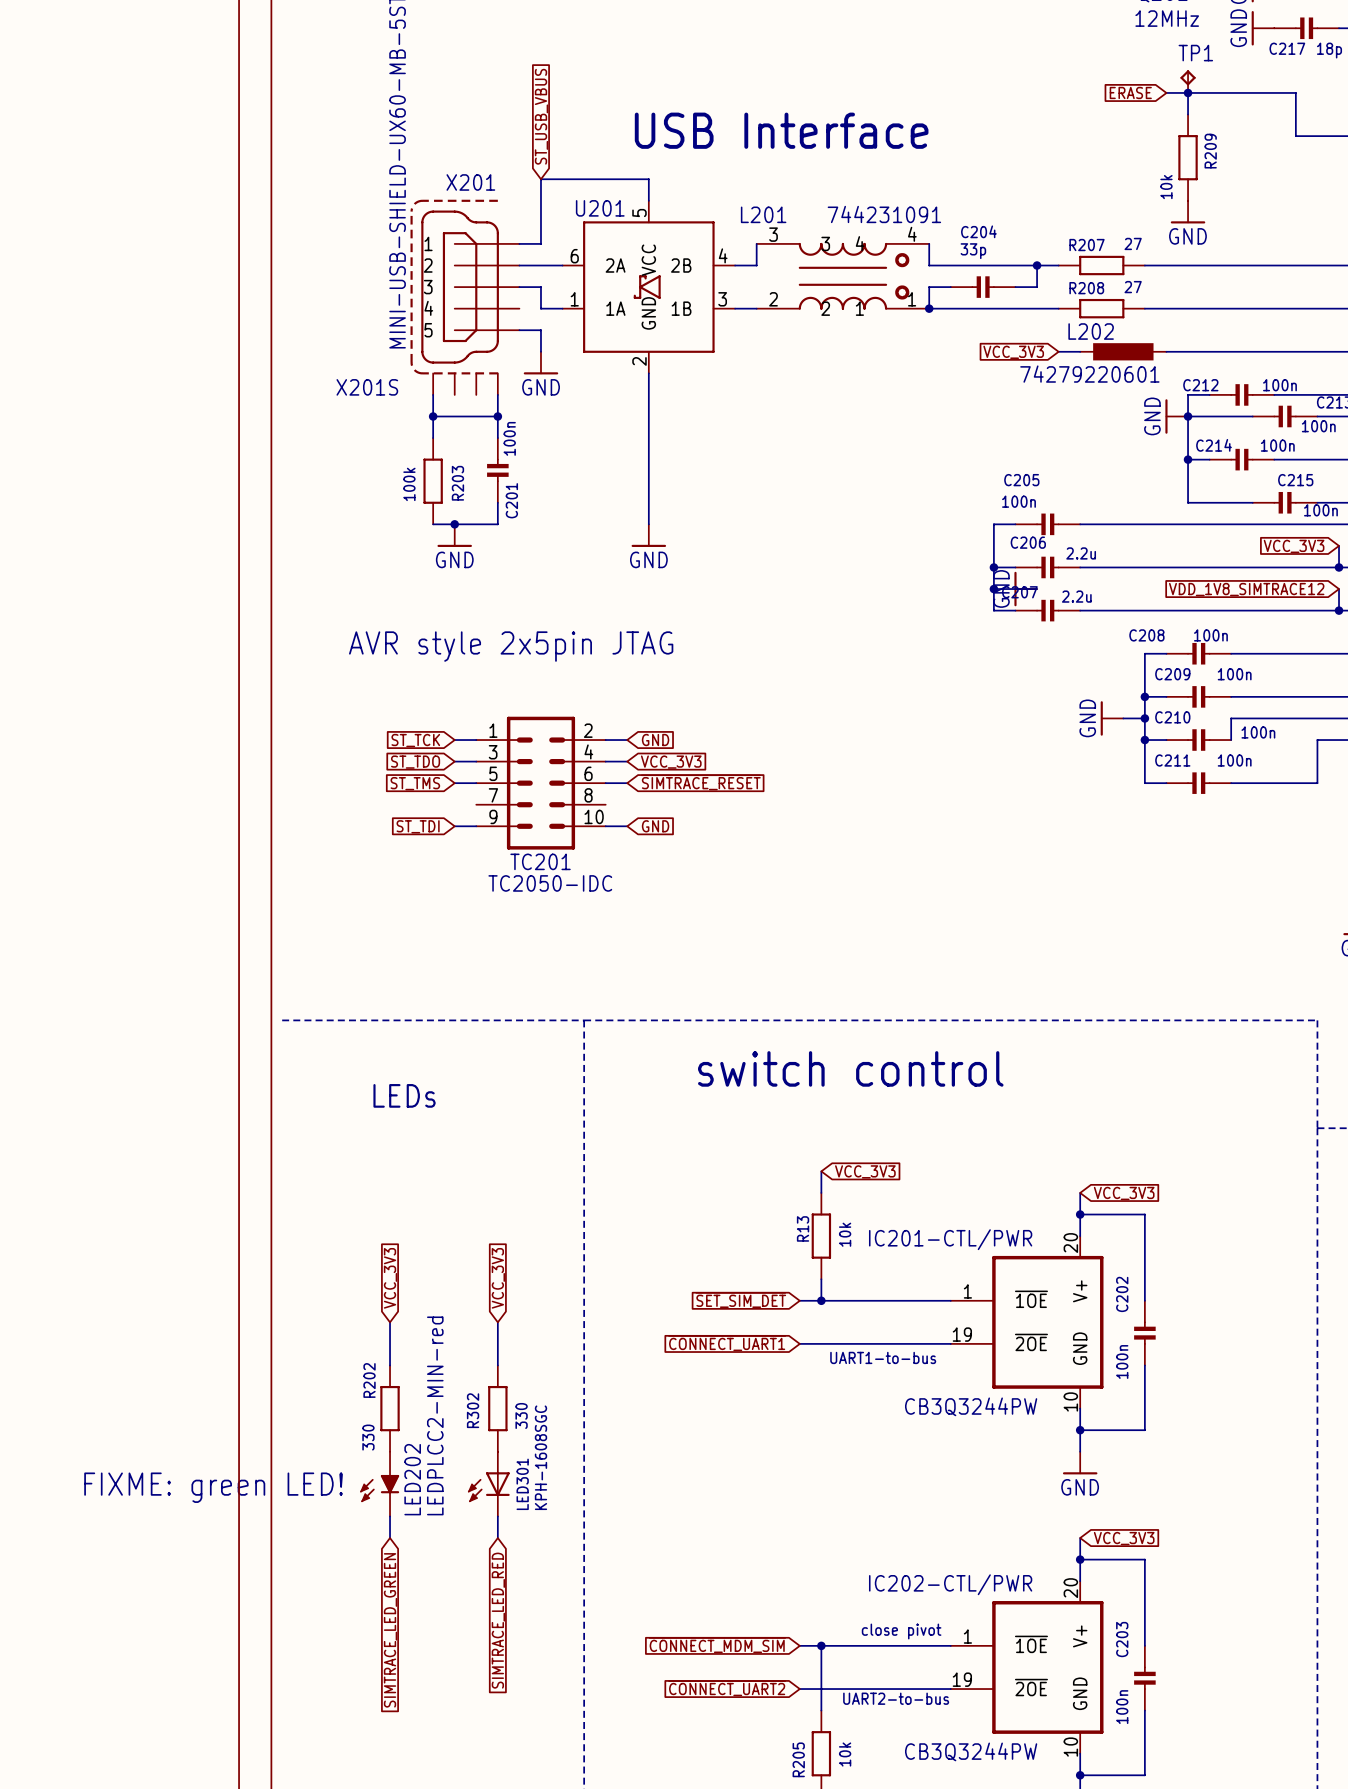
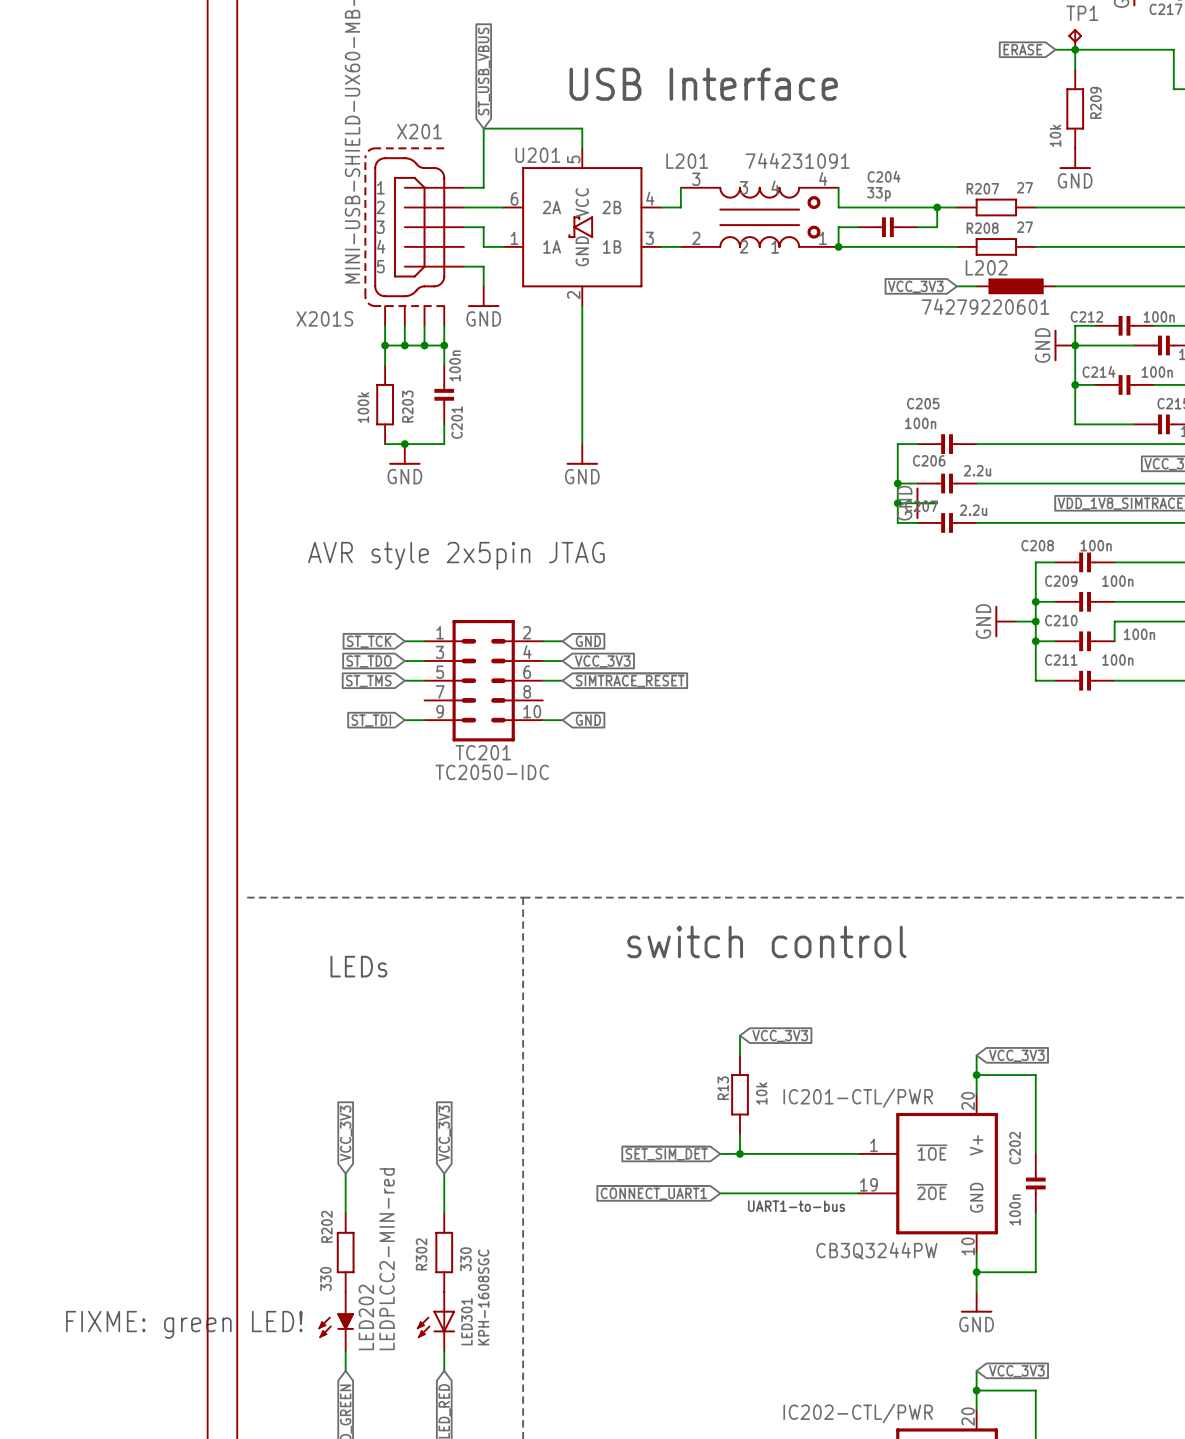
wire: none -> (404, 325) (404, 345)
wire: none -> (424, 325) (424, 345)
junction: none -> (404, 345)
junction: none -> (424, 345)

